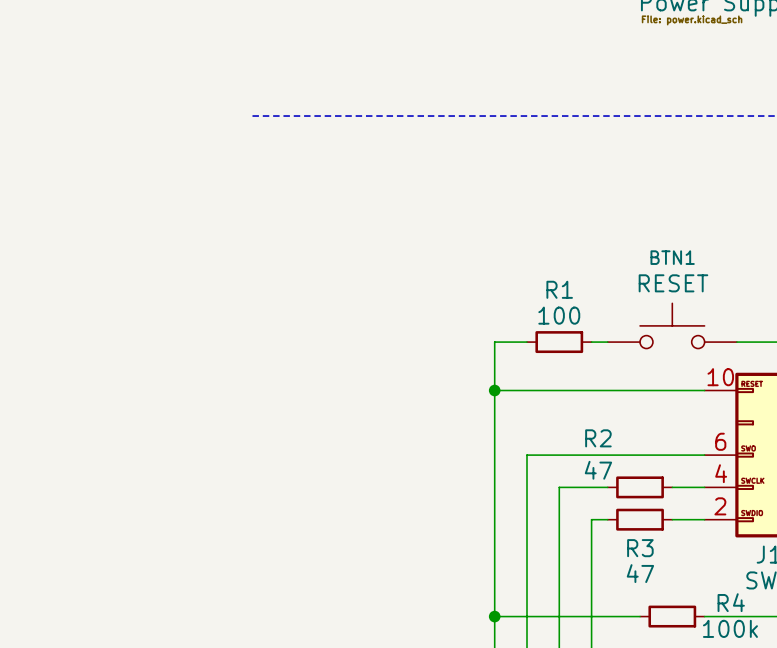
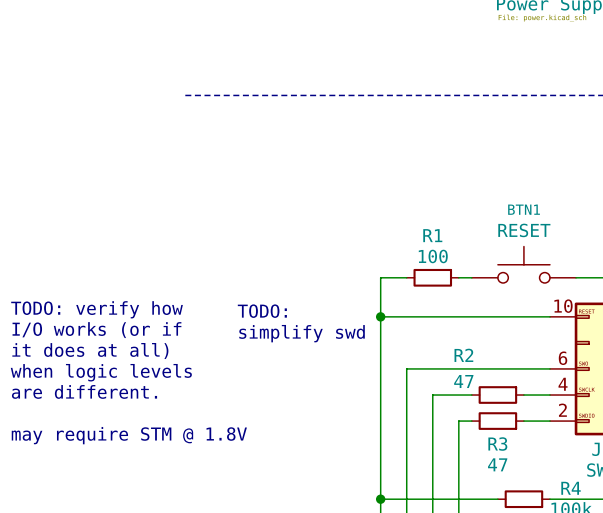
text: none -> TODO: verify how (97, 309)
text: none -> TODO: (262, 311)
text: none -> I/O works (or if (96, 330)
text: none -> simplify swd (302, 333)
text: none -> it does at all) (90, 351)
text: none -> when logic levels (101, 372)
text: none -> are different. (84, 391)
text: none -> may require STM @ 1.8V (129, 435)

